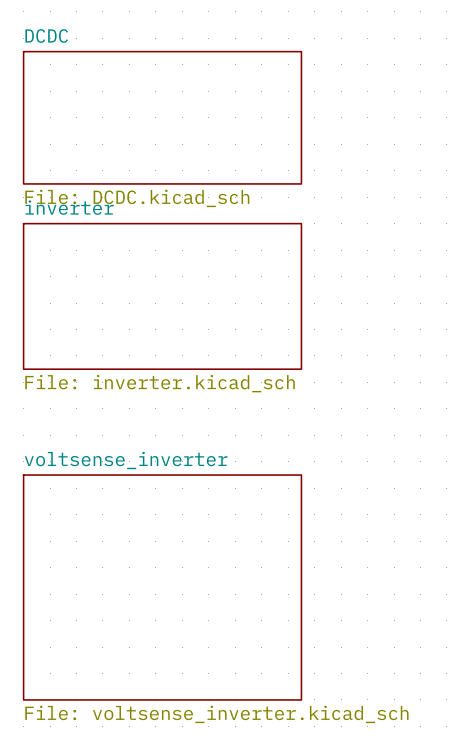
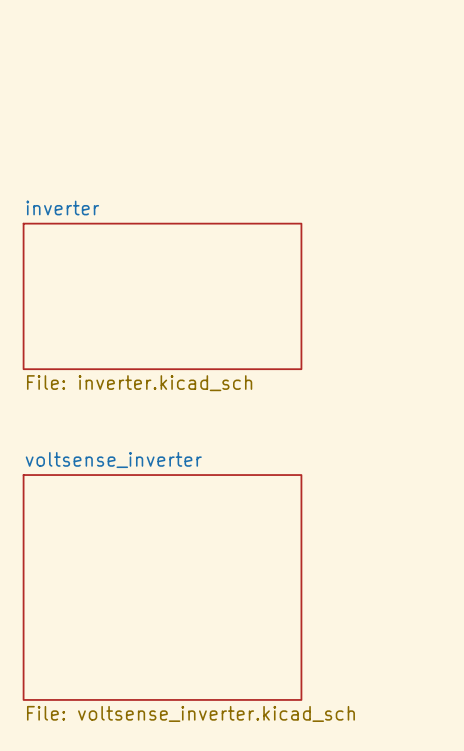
sheet DCDC: File: DCDC.kicad_sch (162, 117) -> none

